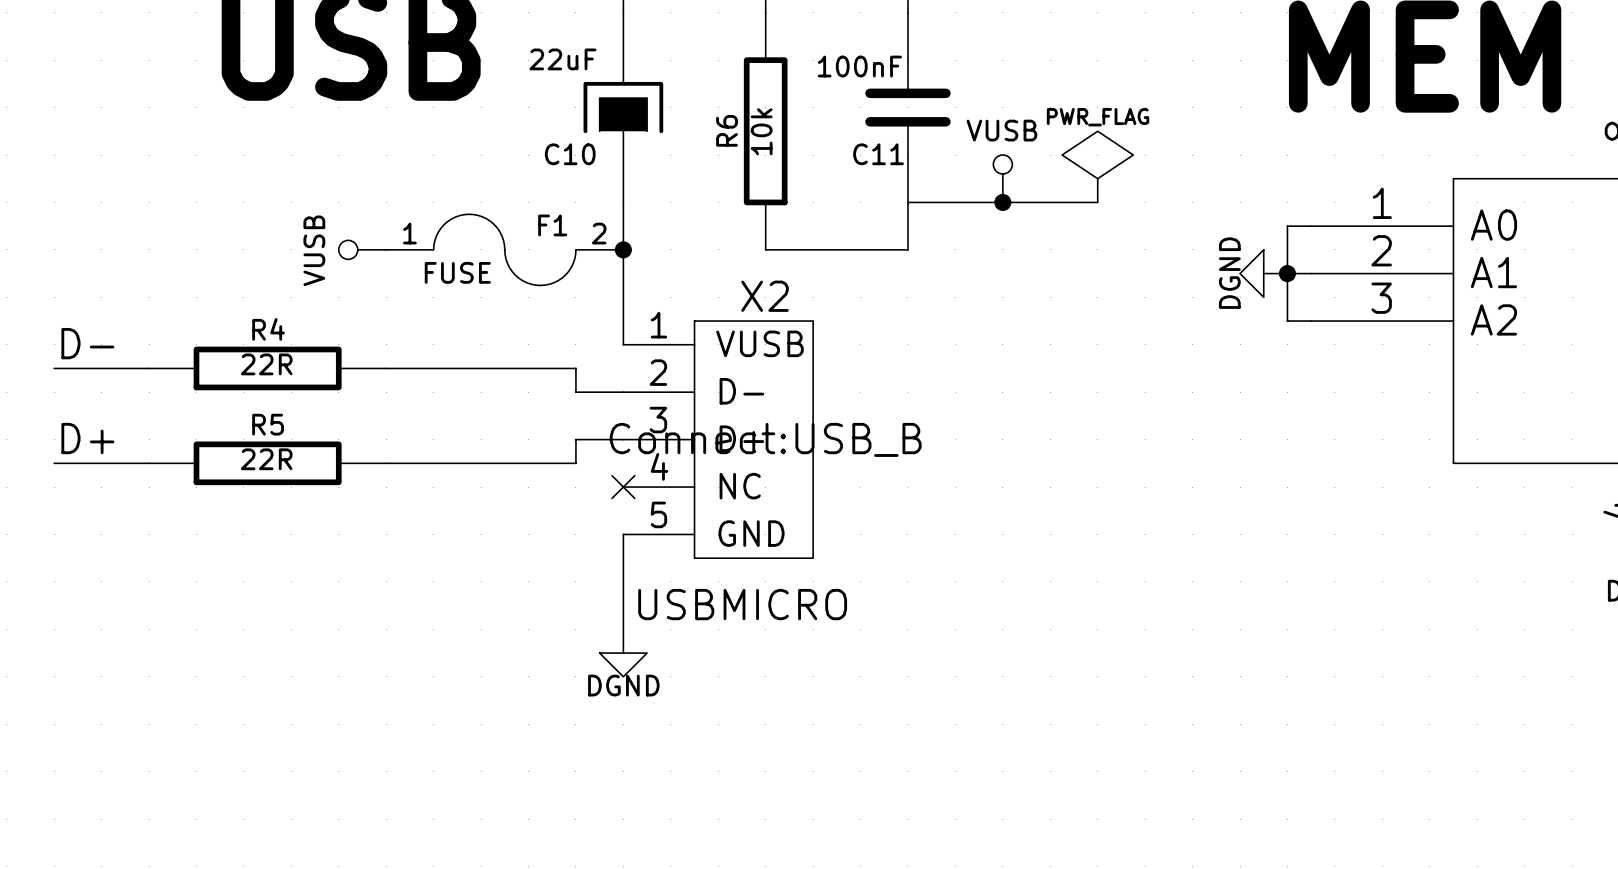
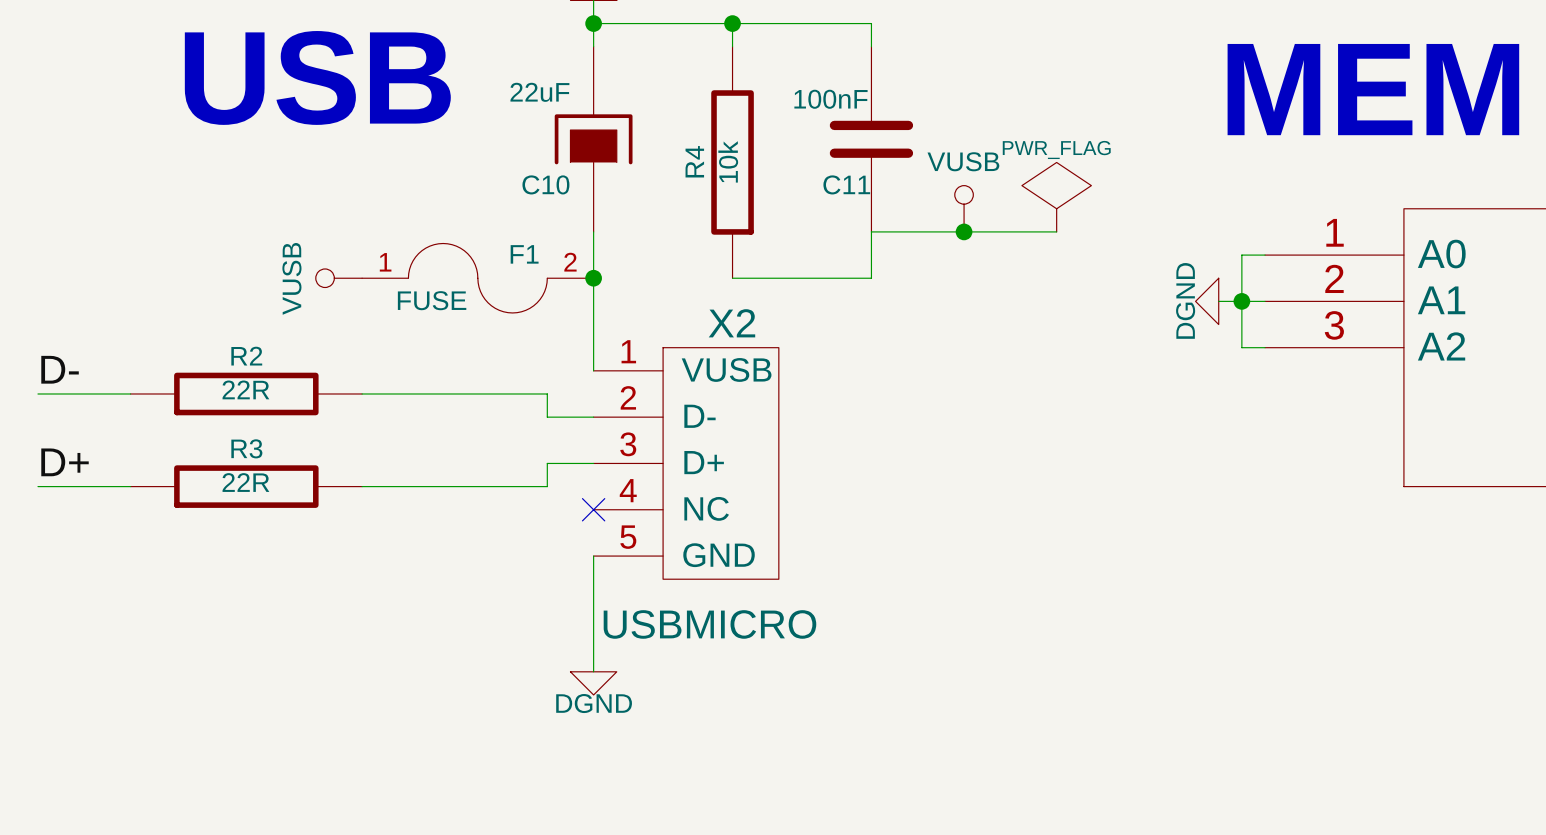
R6 name: R6 (727, 130) -> R4 (694, 161)
R4 name: R4 (268, 329) -> R2 (246, 356)
R5 name: R5 (268, 424) -> R3 (246, 448)
X2 text: Connect:USB_B (765, 439) -> none

